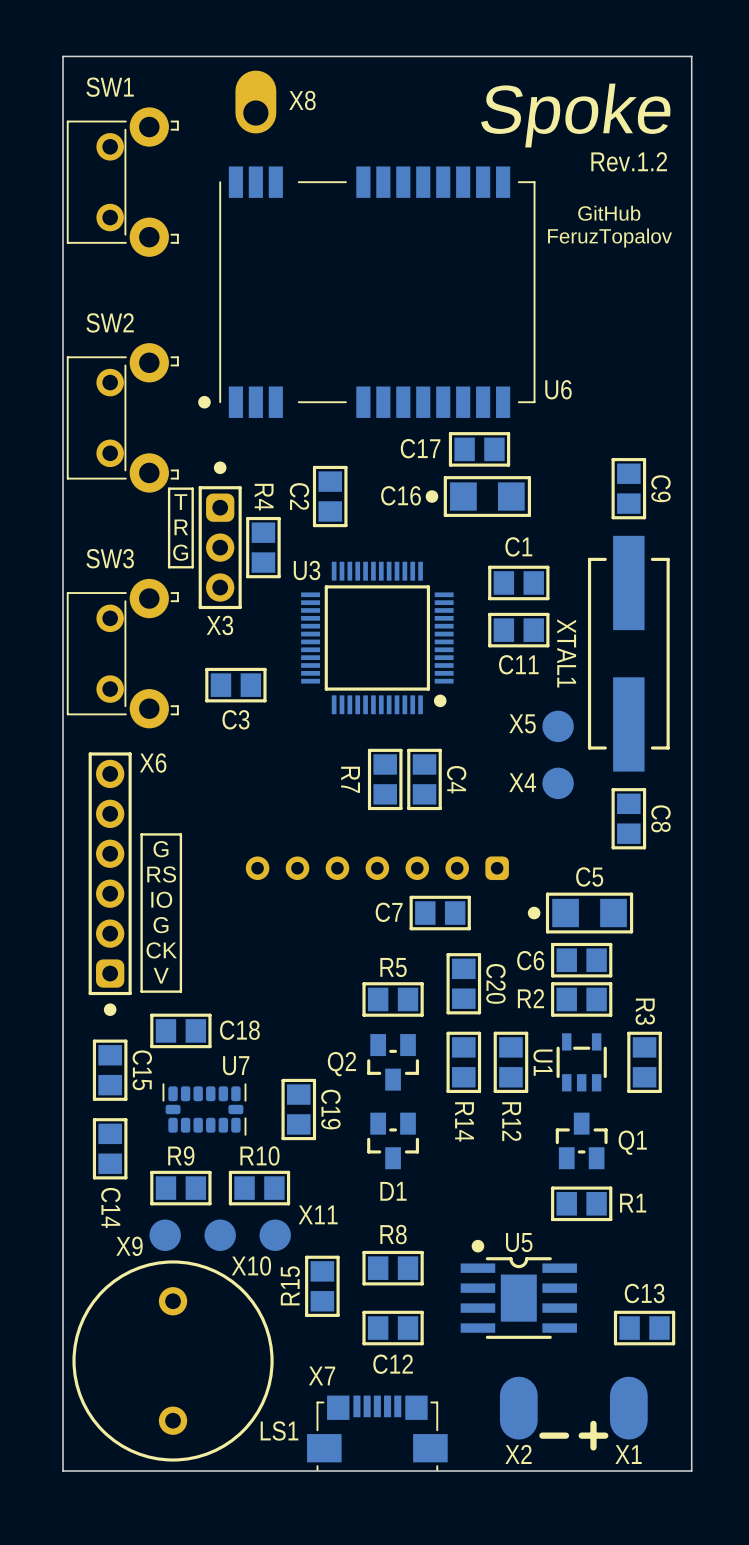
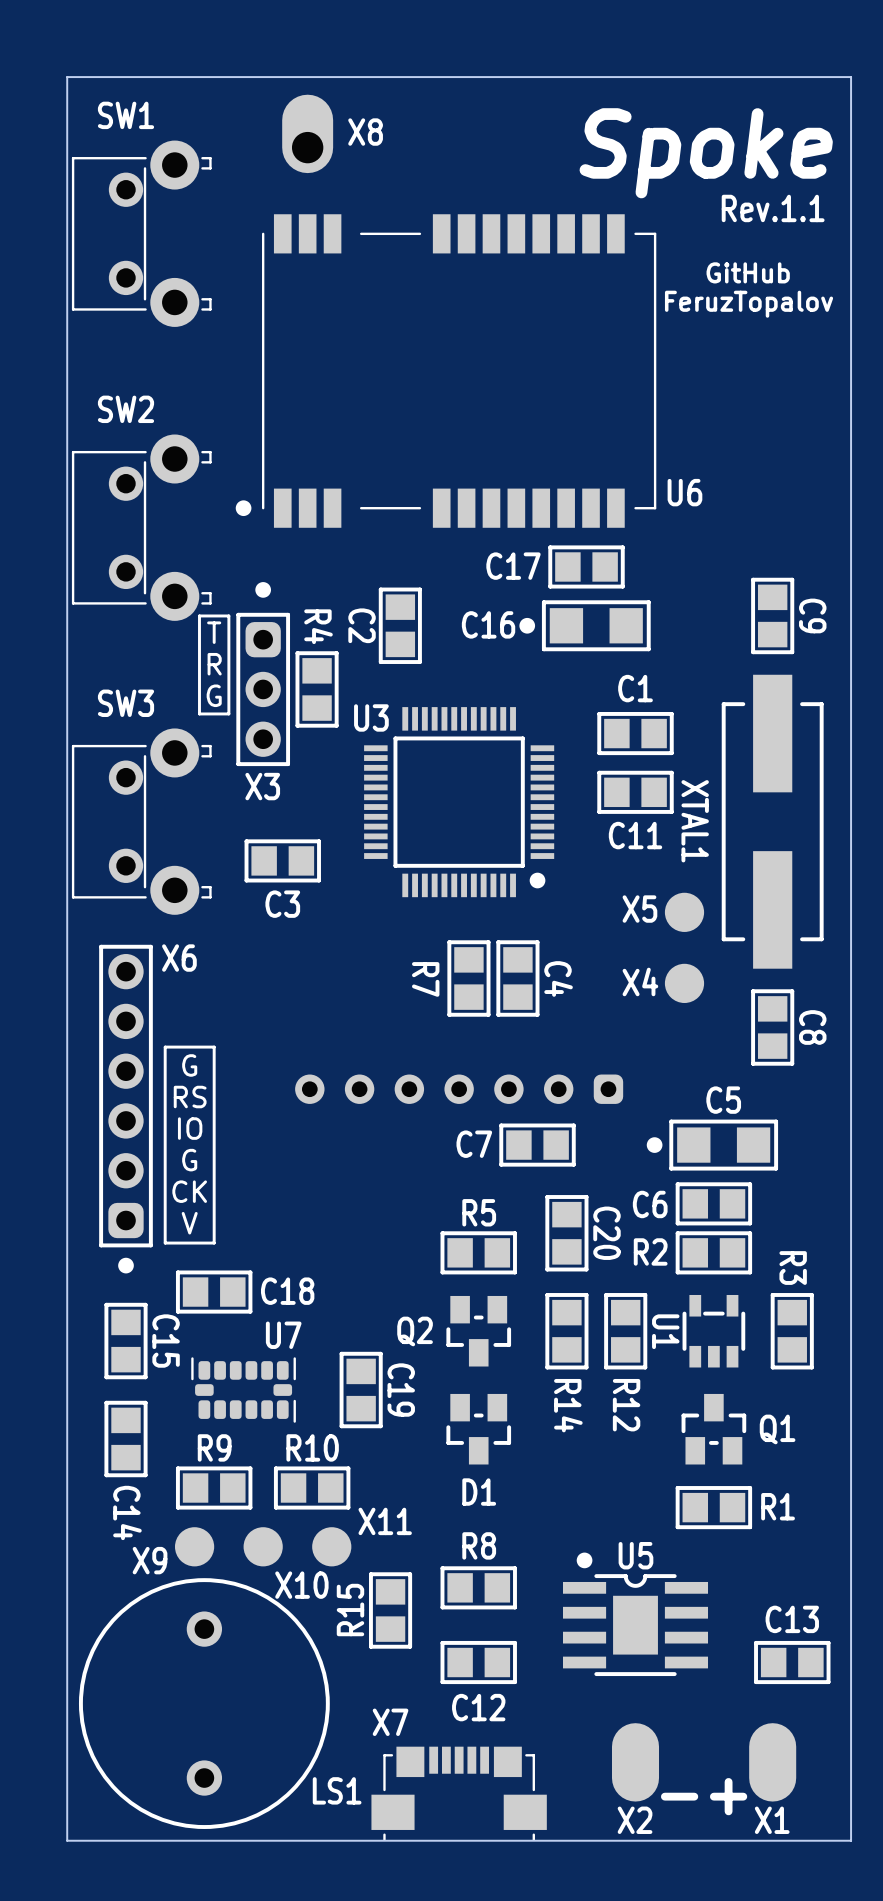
text: Rev.1.2 (629, 161) -> Rev.1.1 (773, 208)

